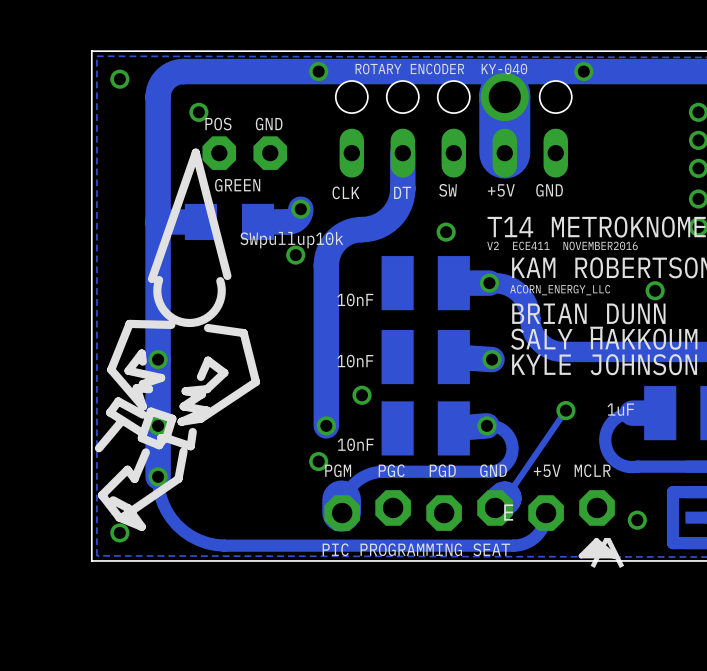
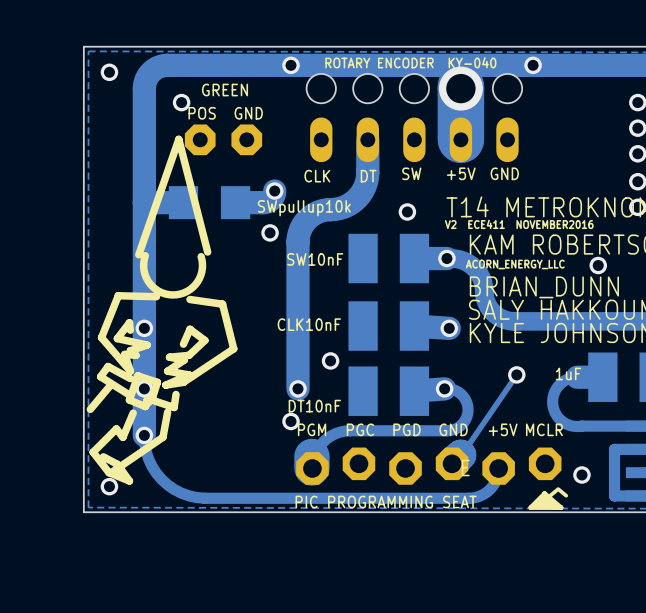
text position: GREEN (237, 185) -> GREEN (224, 90)
text position: SWpullup10k (291, 240) -> SWpullup10k (304, 208)
text: 10nF (355, 299) -> SW10nF (315, 259)
text: 10nF (355, 361) -> CLK10nF (309, 324)
text: 10nF (355, 444) -> DT10nF (314, 406)

